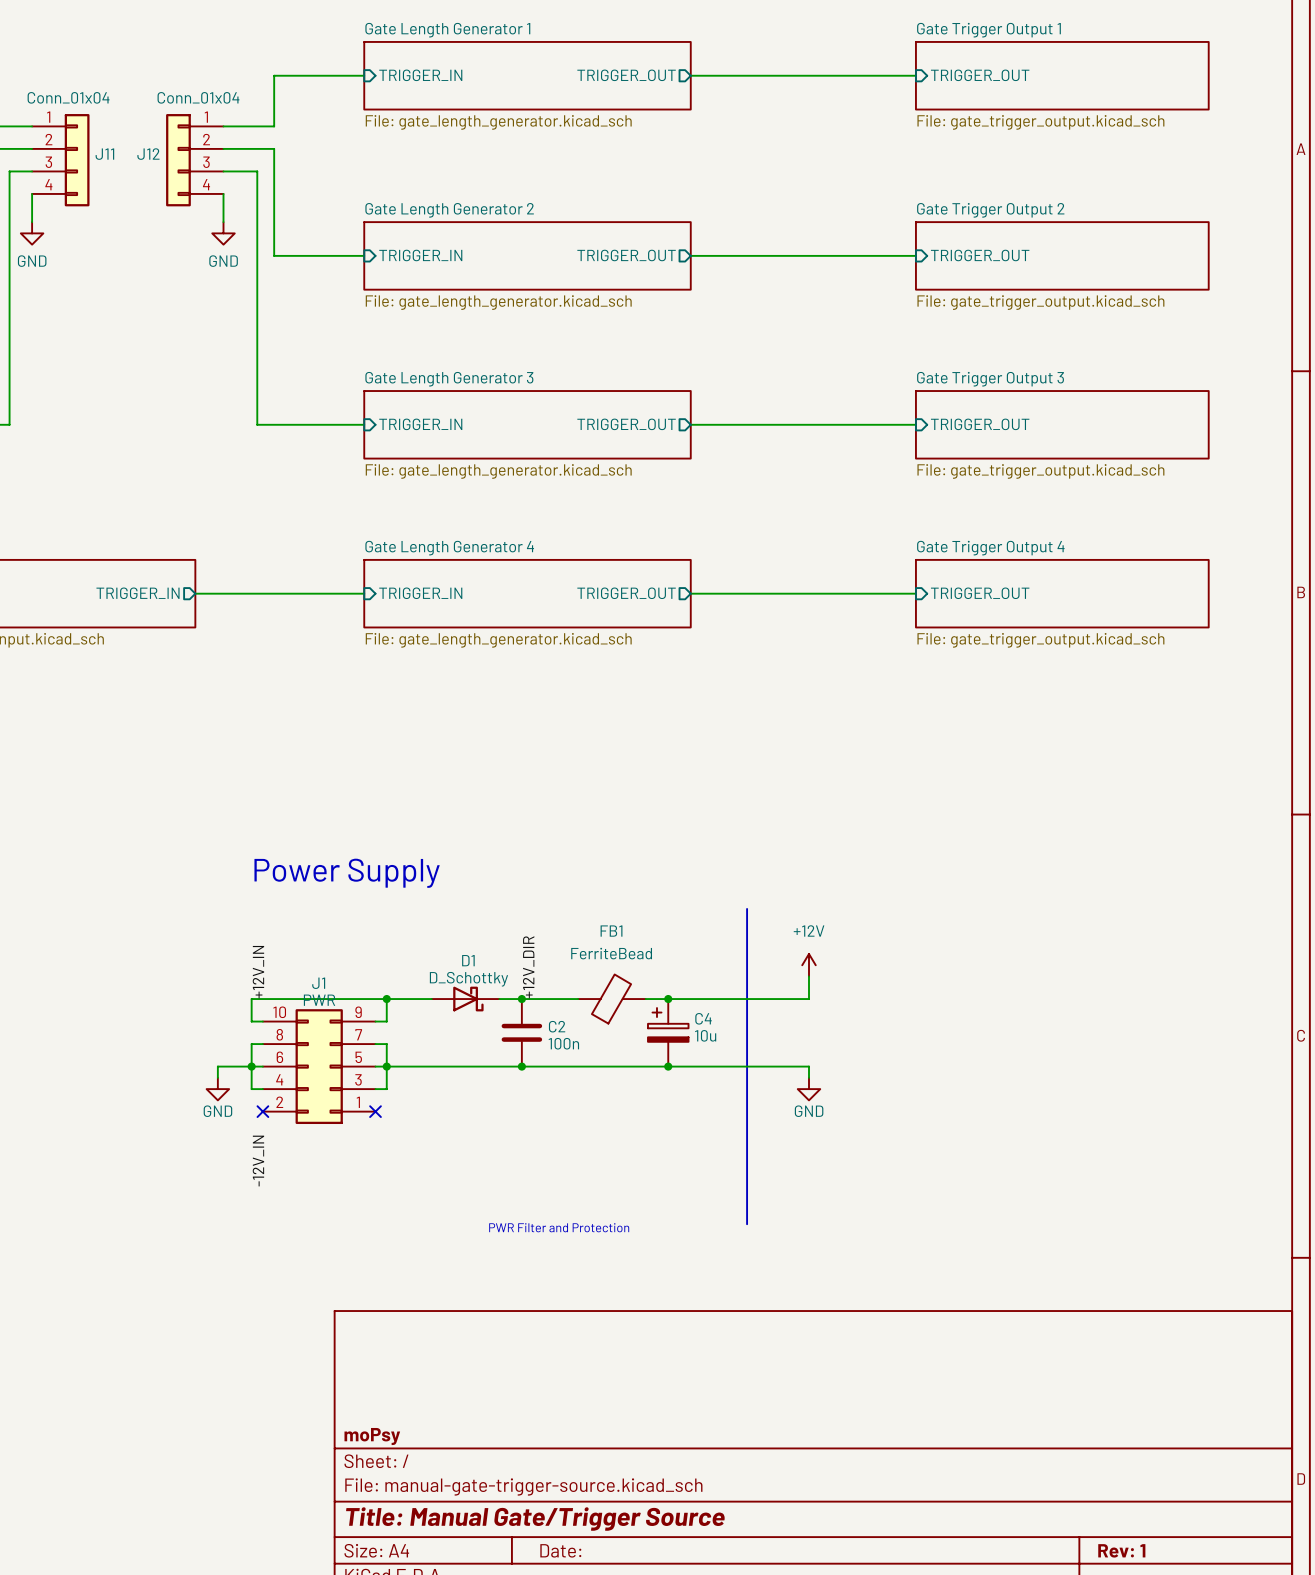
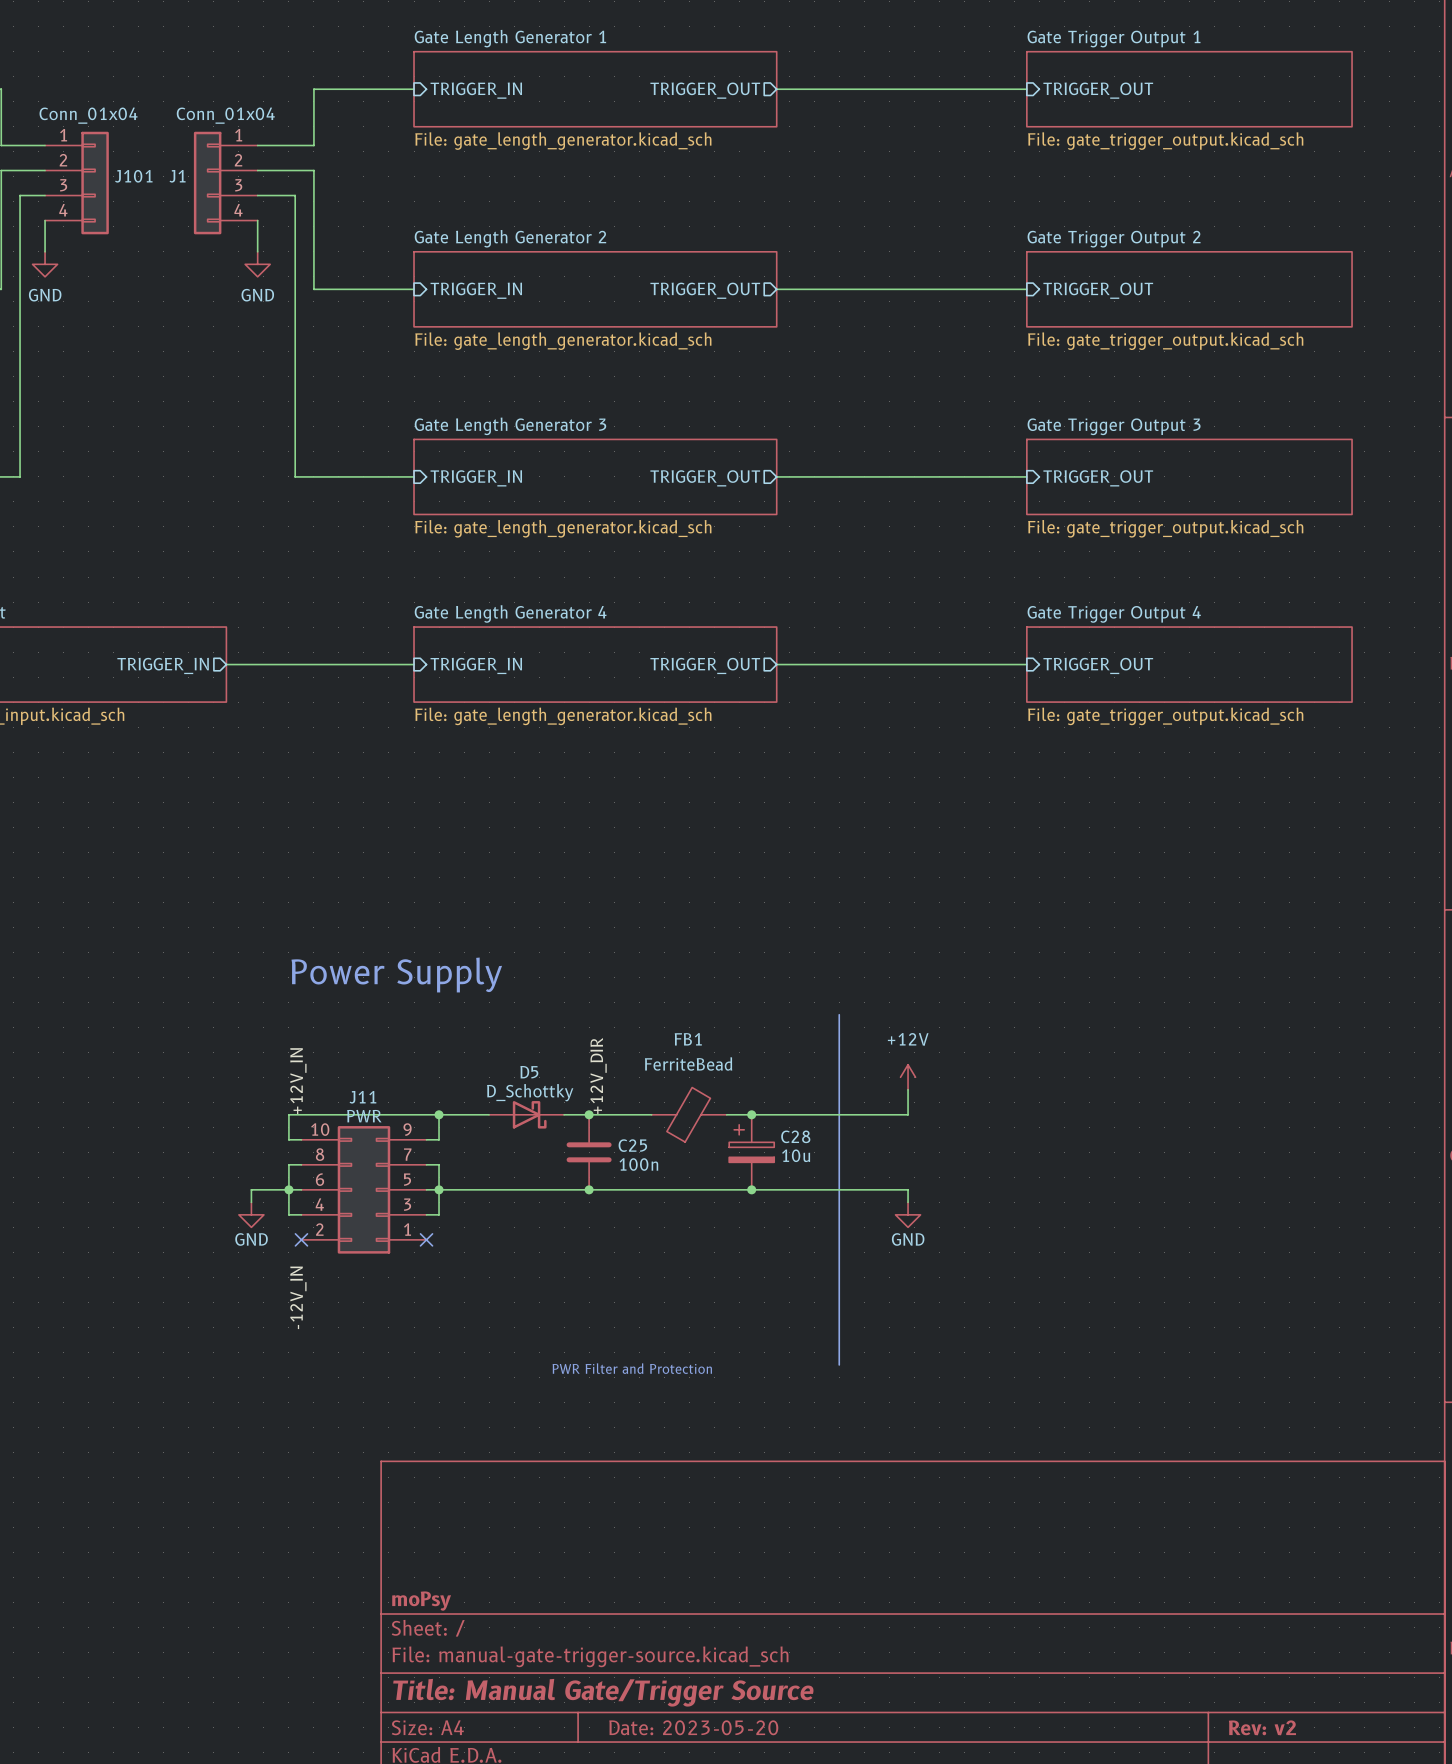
J11 name: J11 (104, 154) -> J101 (133, 176)
J12 name: J12 (148, 154) -> J1 (177, 176)
D1 name: D1 (468, 960) -> D5 (529, 1072)
J1 name: J1 (318, 983) -> J11 (362, 1097)
C4 name: C4 (703, 1018) -> C28 (795, 1136)
C2 name: C2 (557, 1026) -> C25 (632, 1145)
title block: Date: (560, 1550) -> Date: 2023-05-20 (693, 1727)
title block: Rev: 1 (1121, 1550) -> Rev: v2 (1262, 1727)

